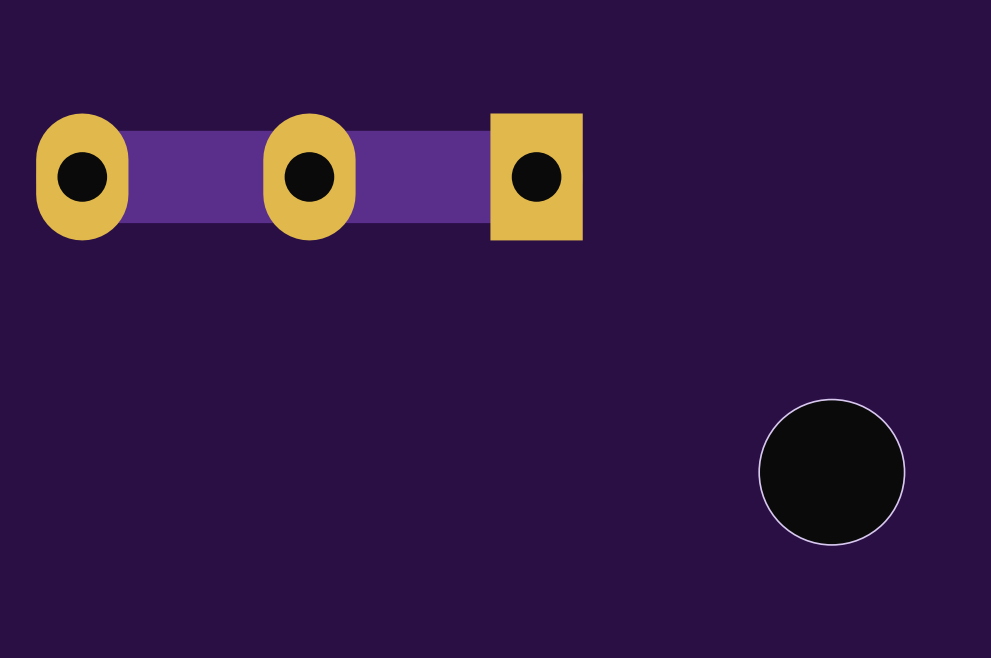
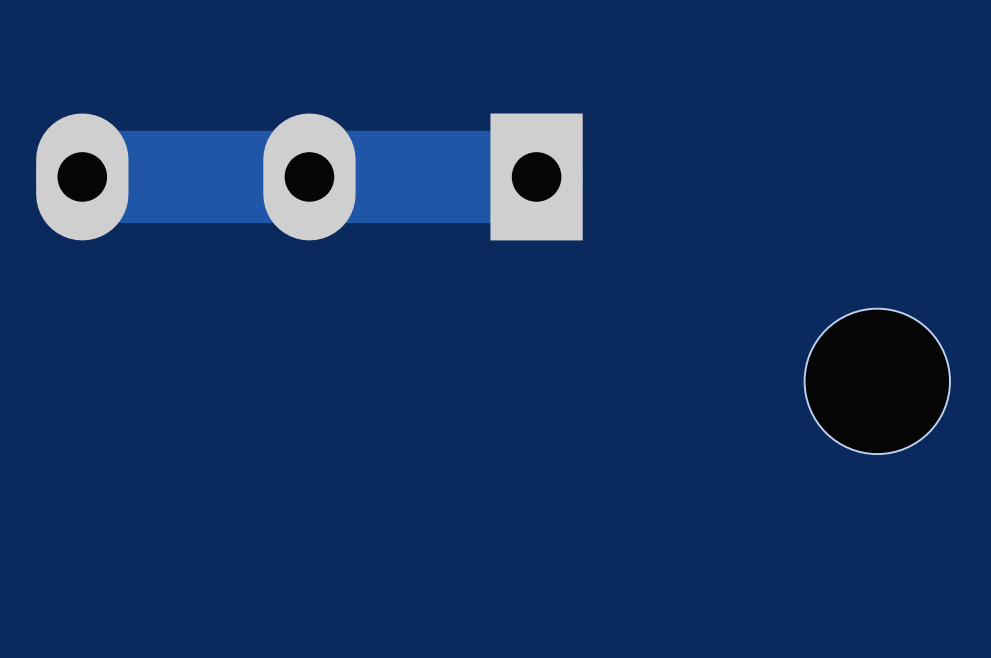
part position: (831, 472) -> (877, 381)

